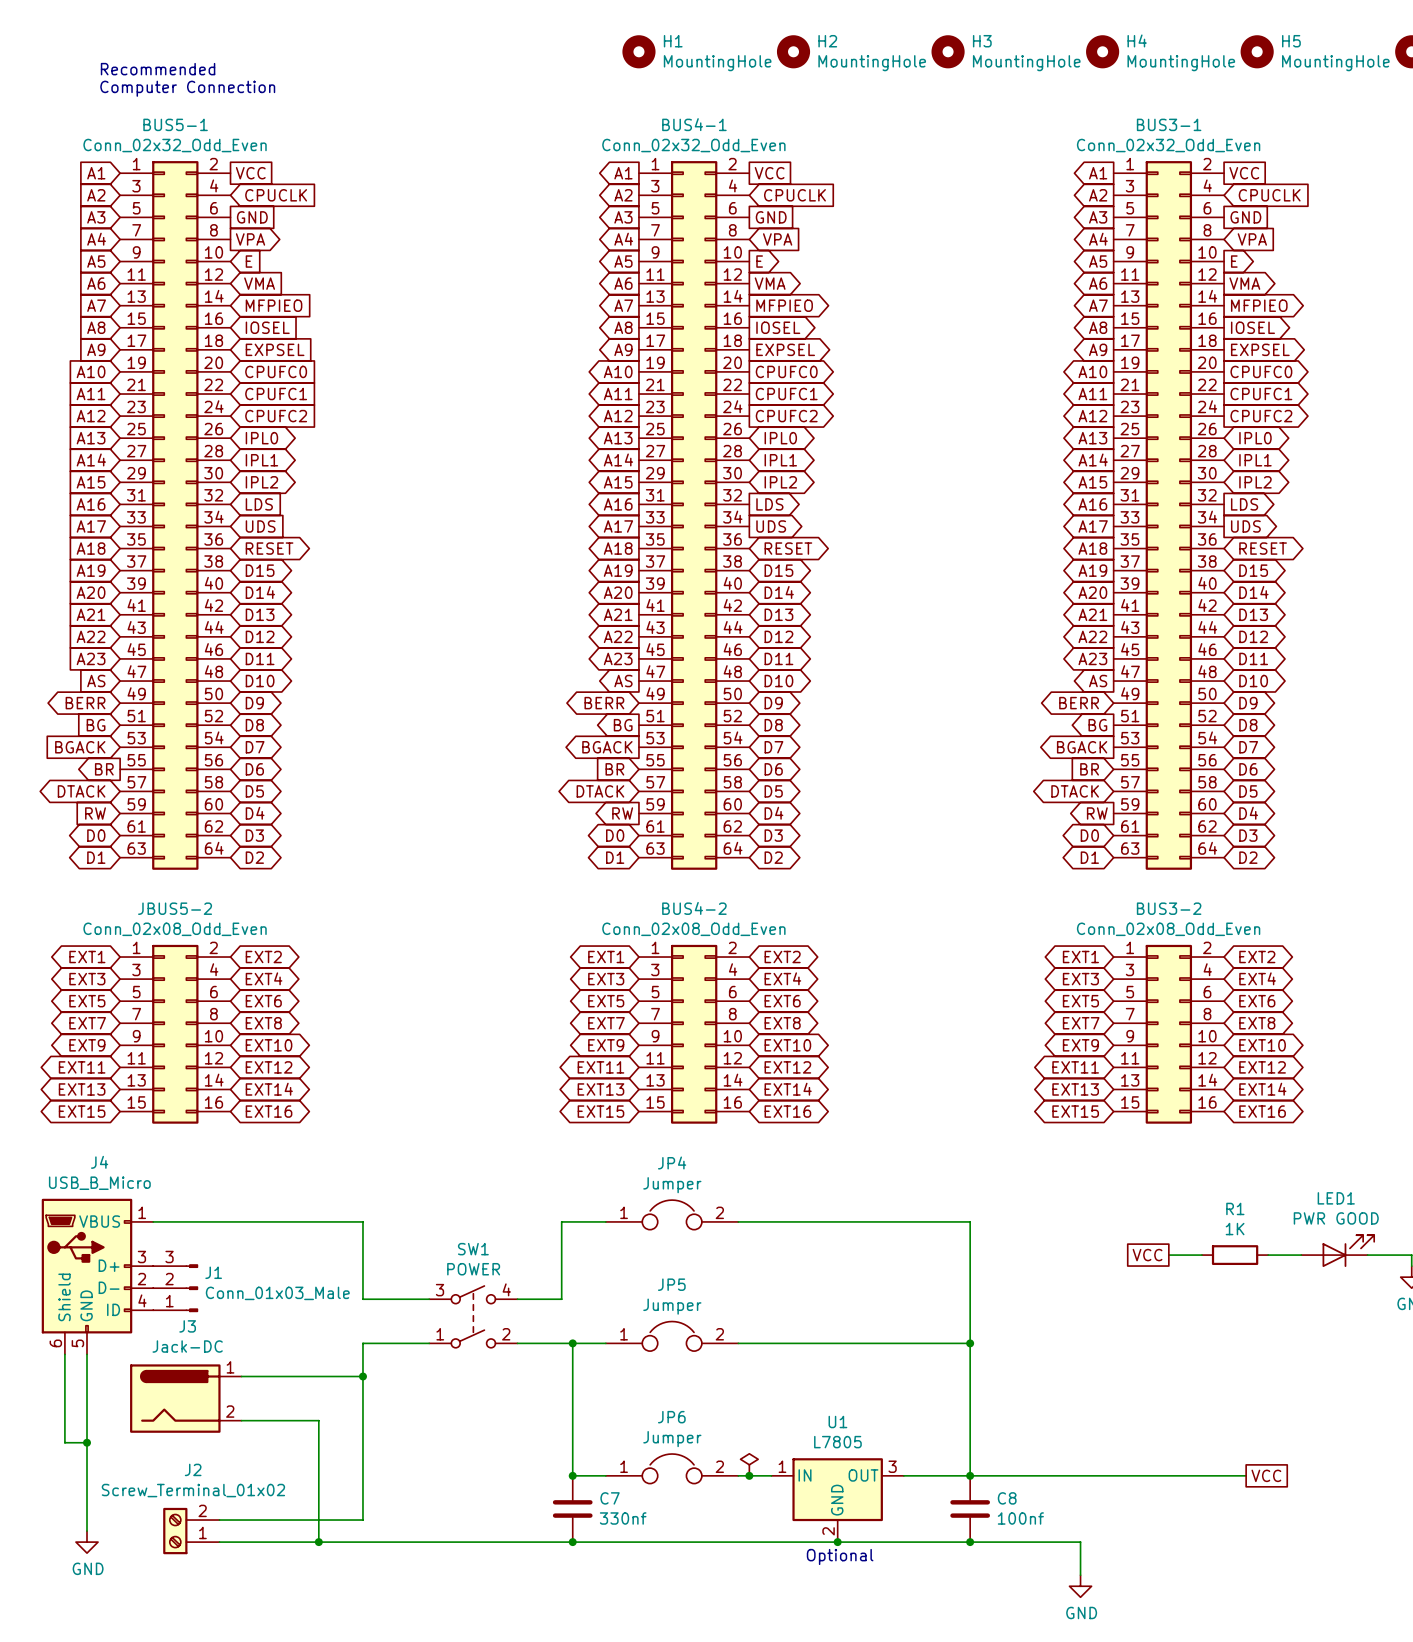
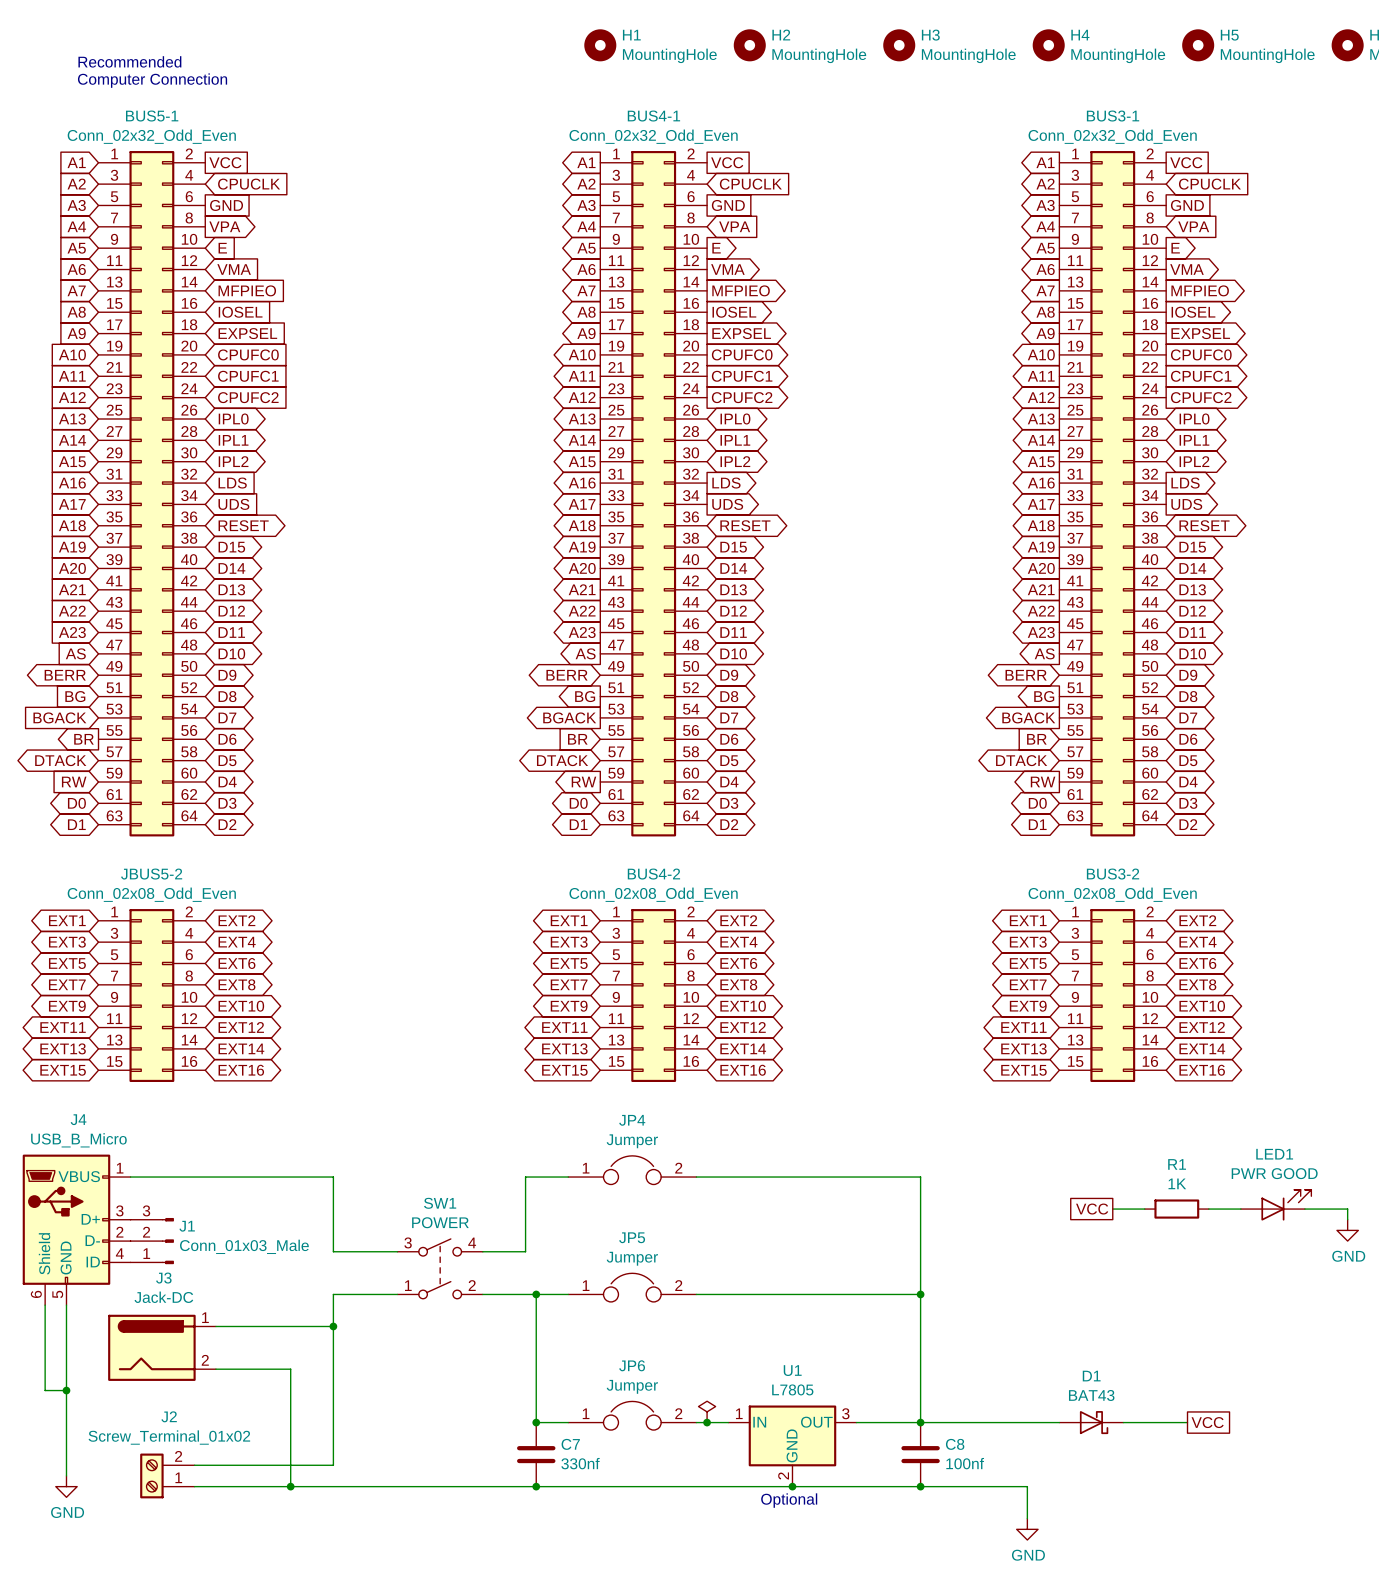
D1: none -> BAT43 (1091, 1422)

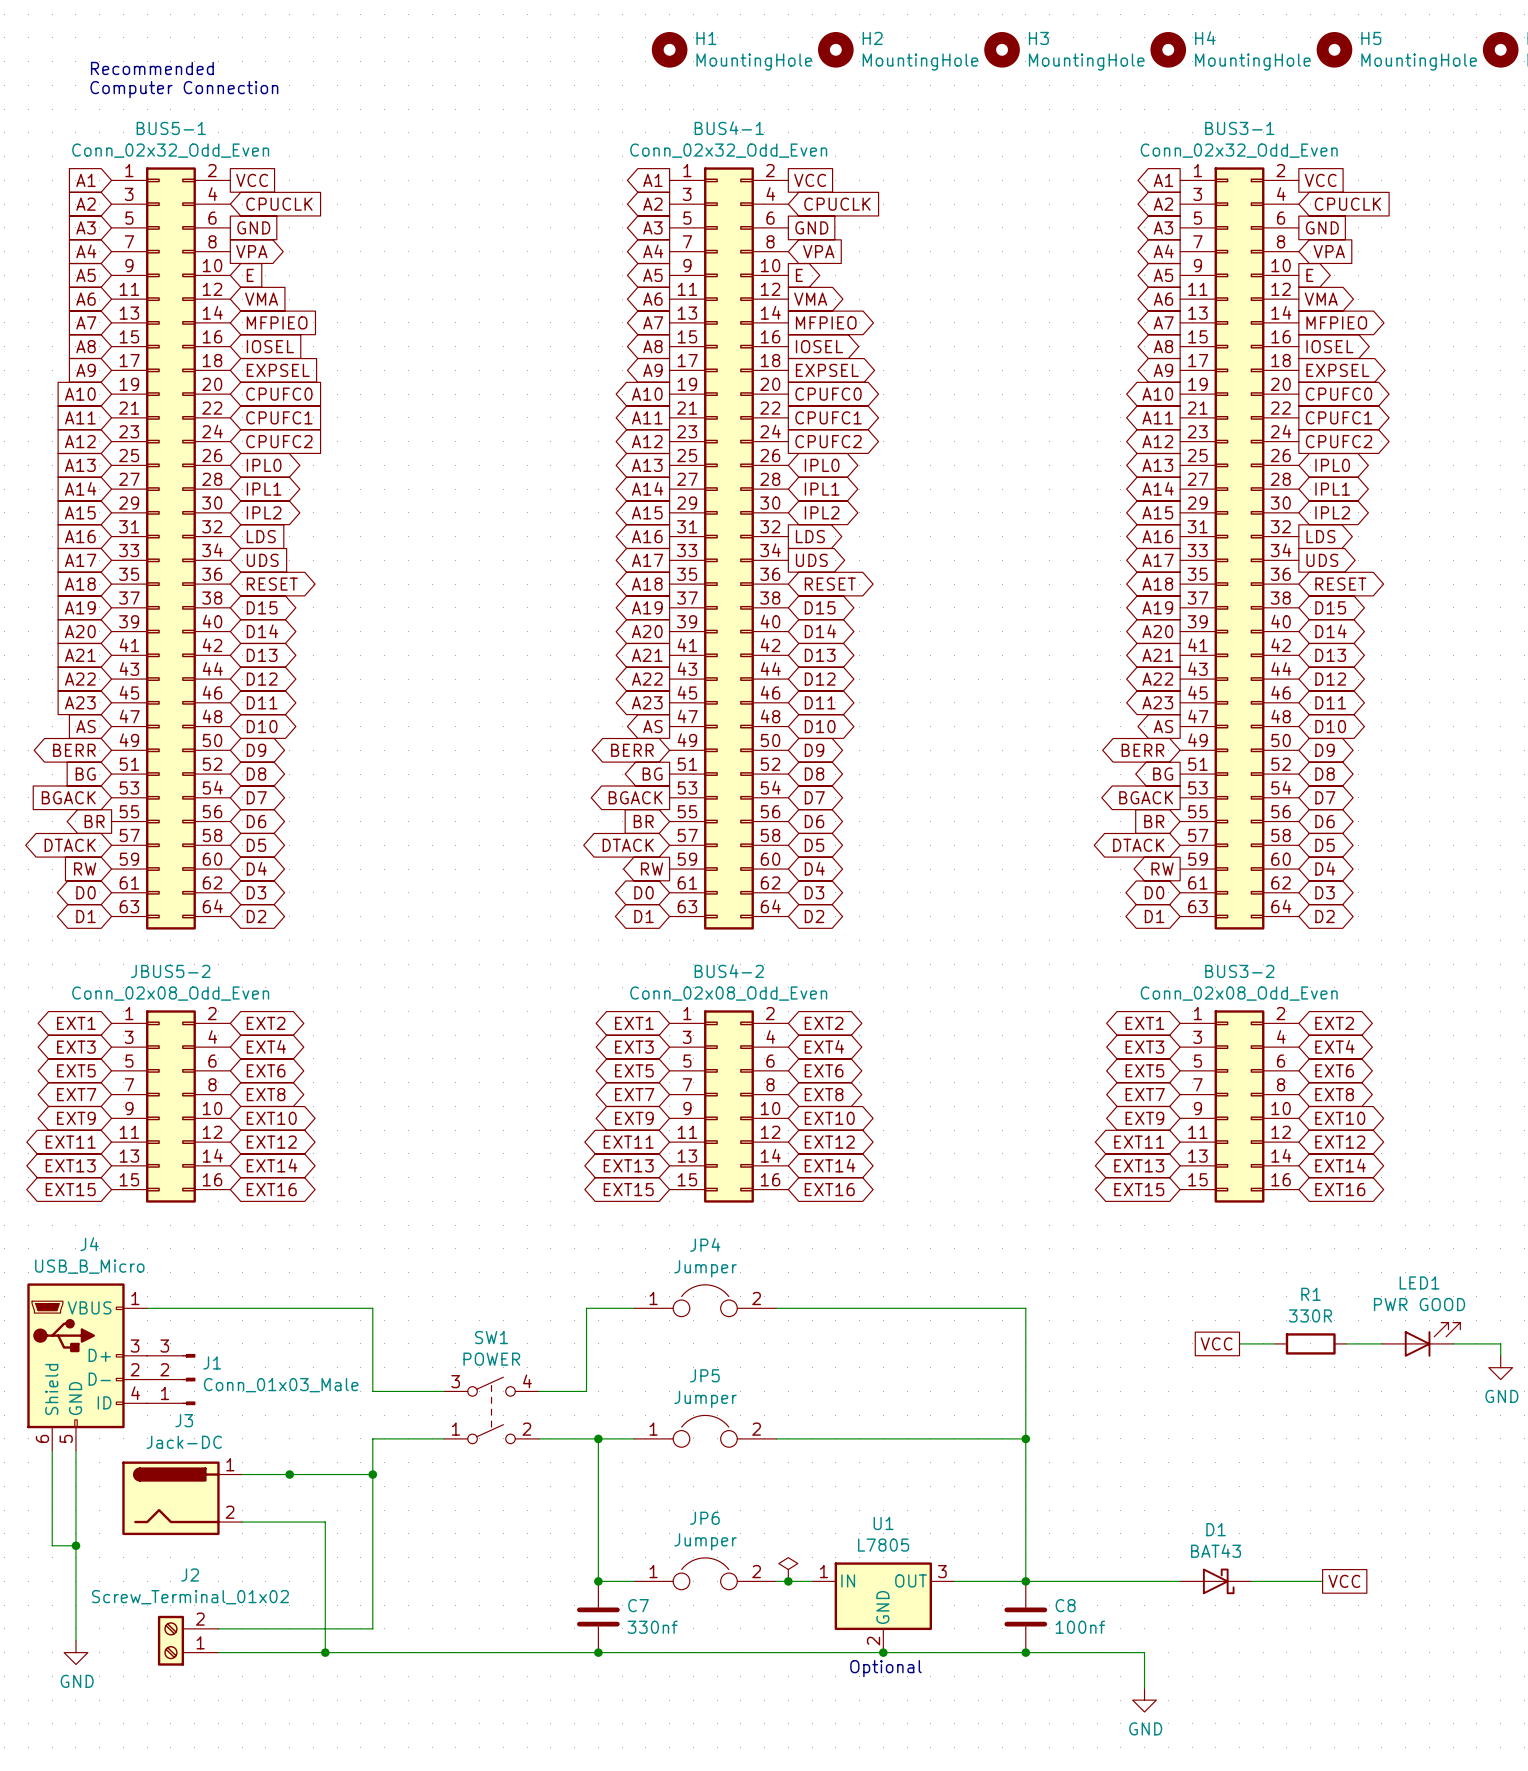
R1 value: 1K (1177, 1183) -> 330R (1310, 1315)
junction: none -> (289, 1474)

